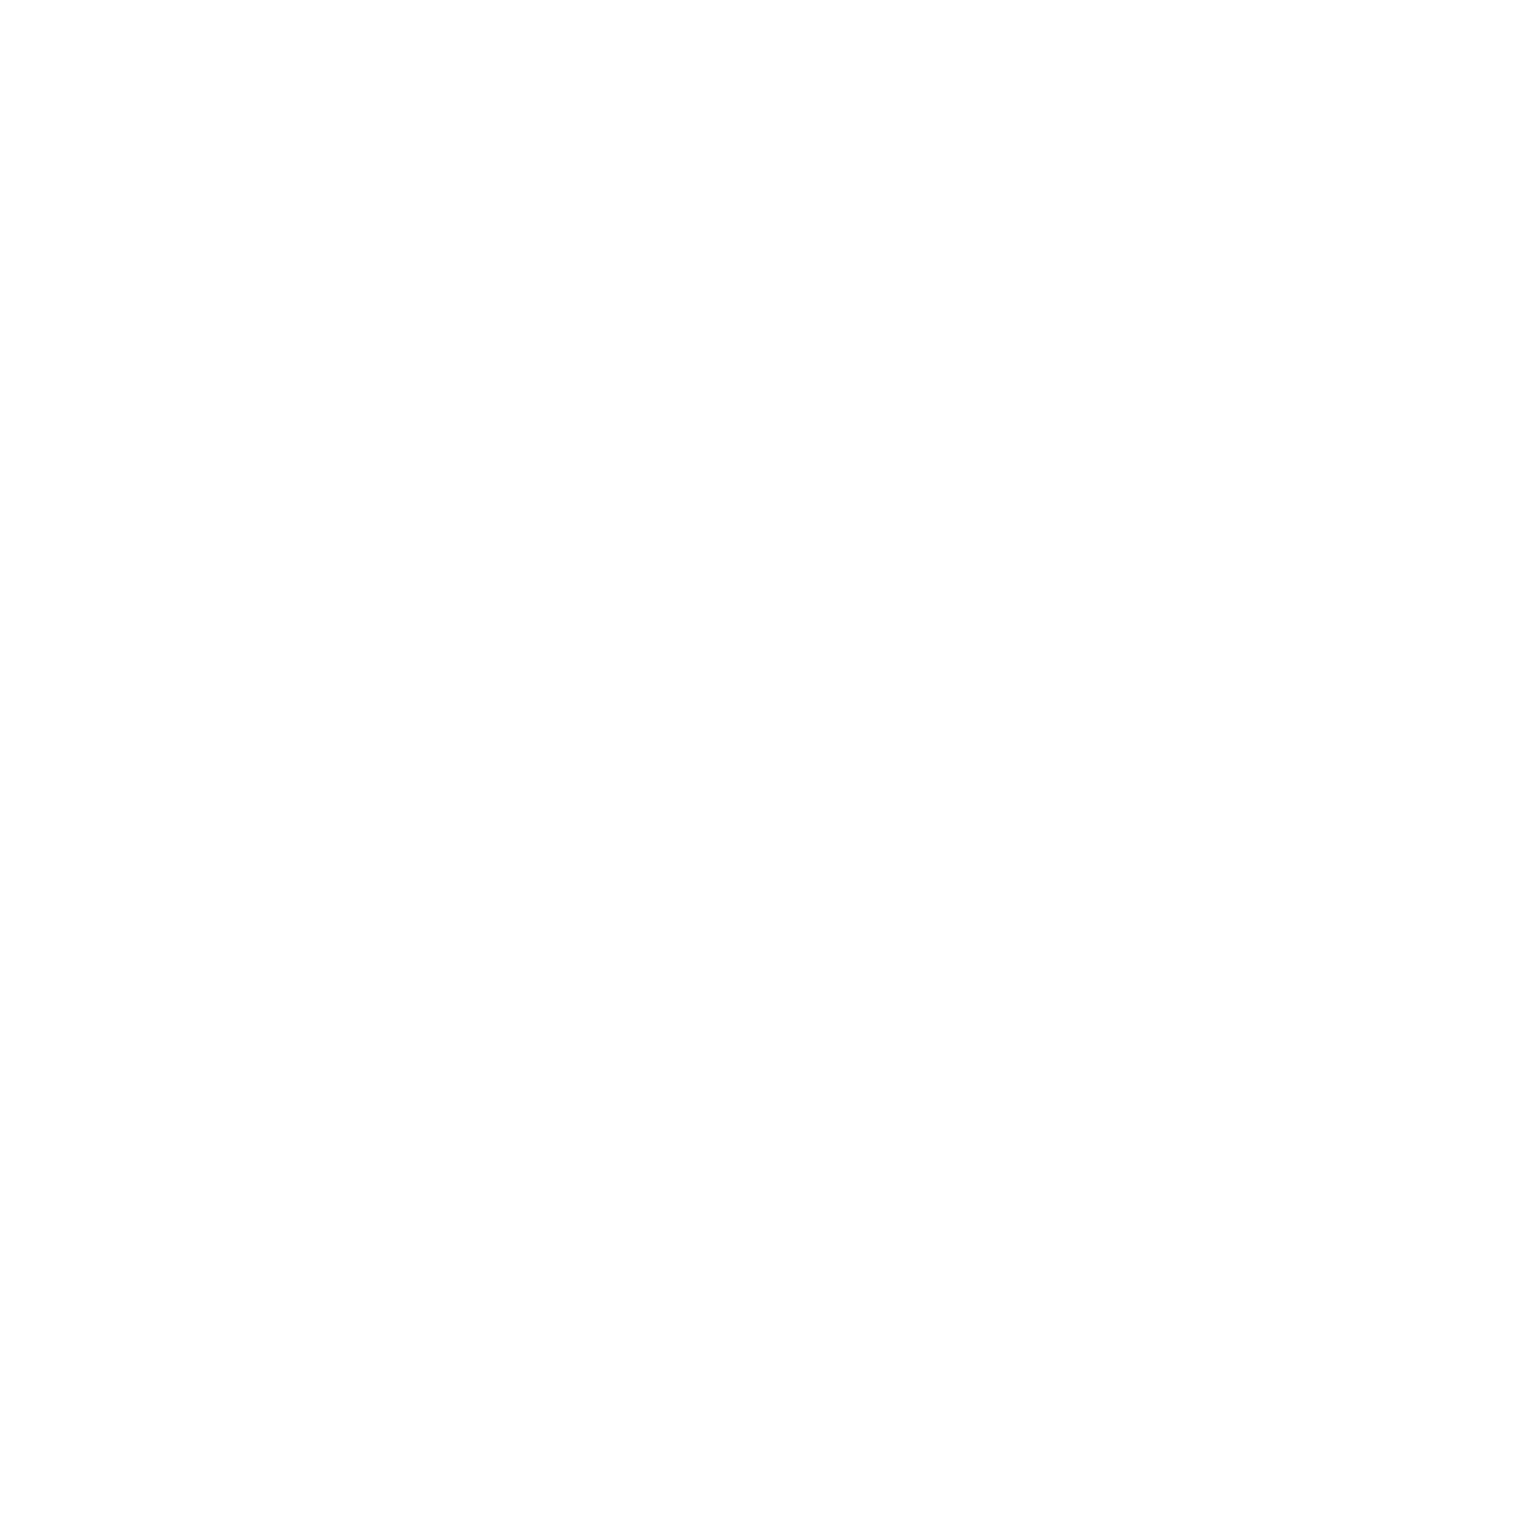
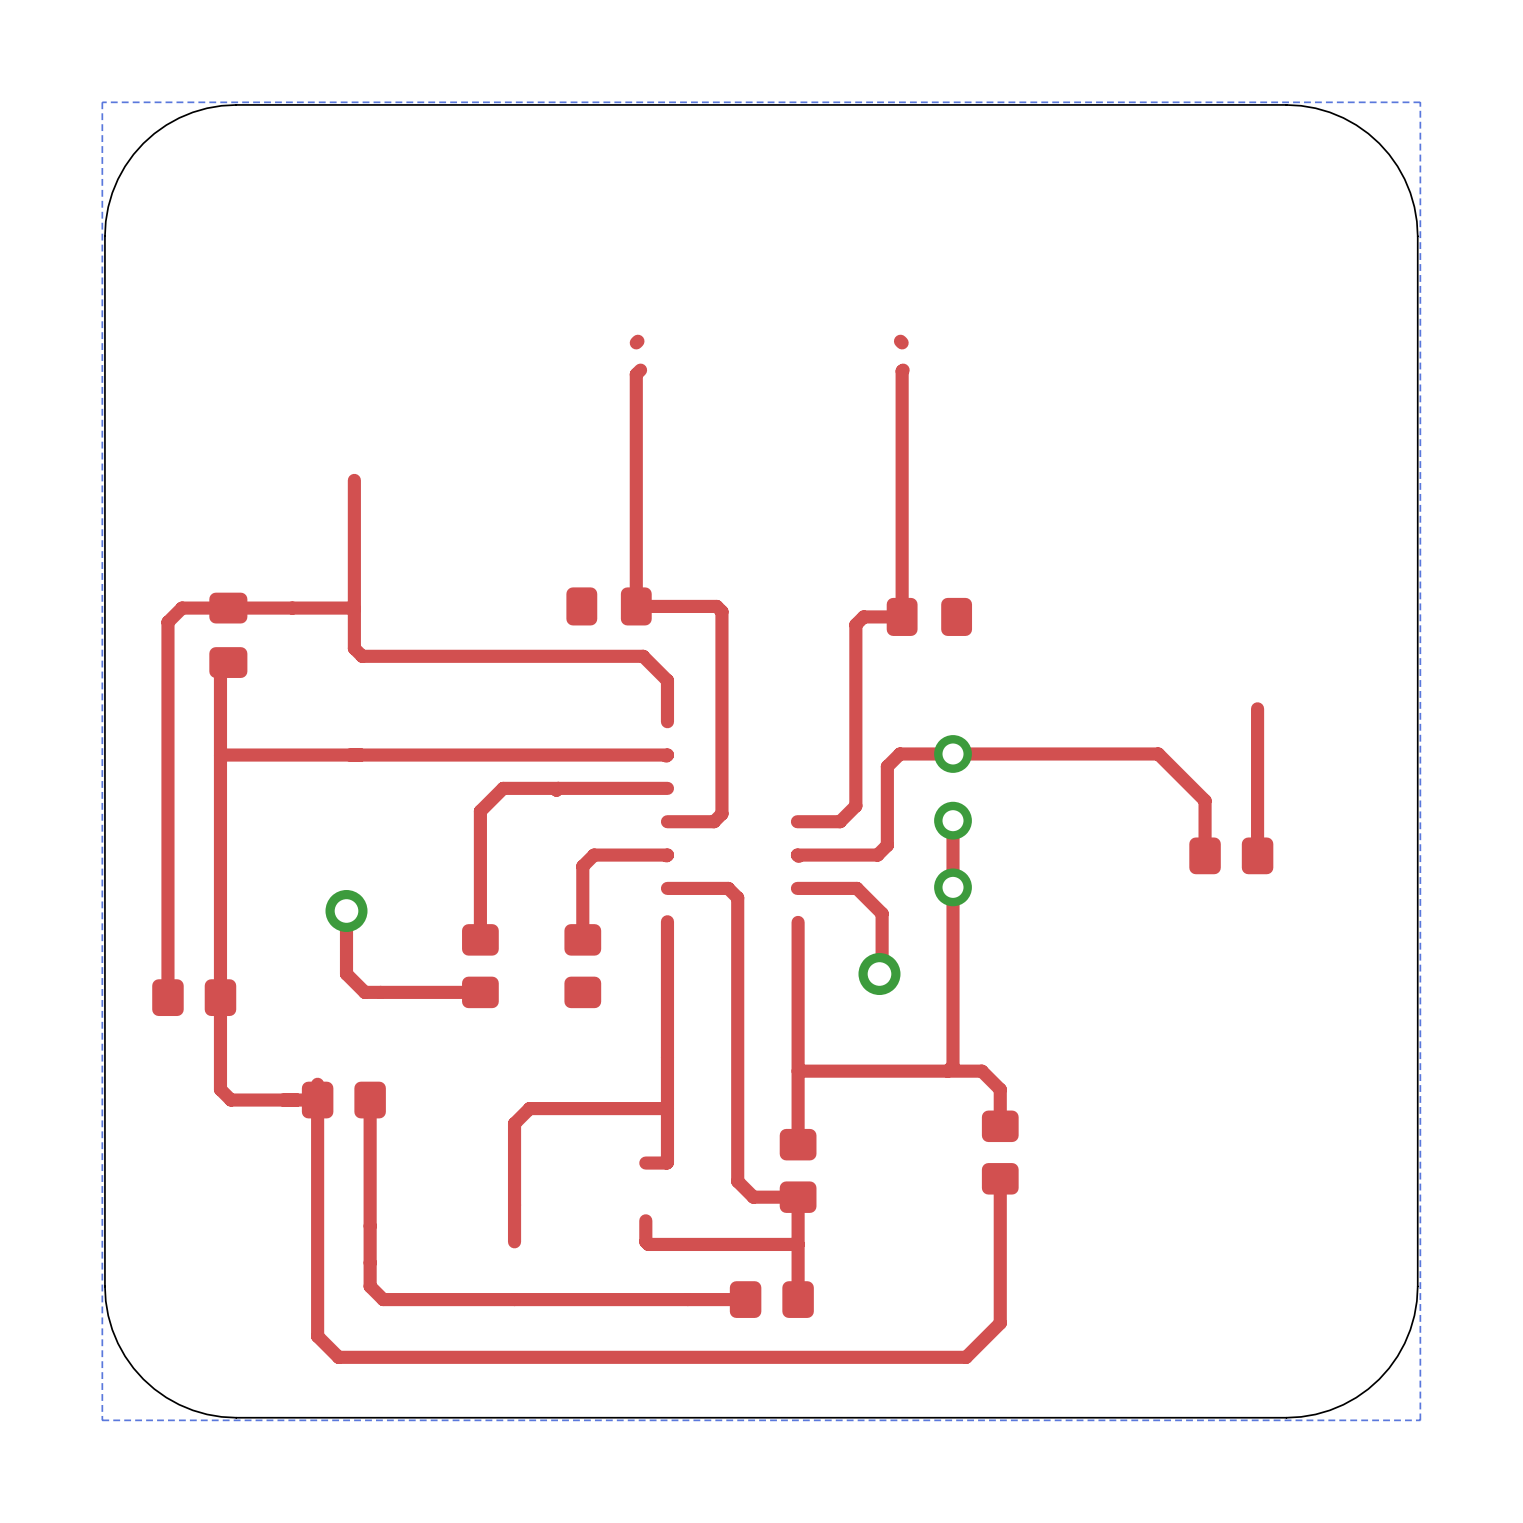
bottom zone outline: none -> (1420, 102) (1420, 1420) (102, 1420) (102, 102) (1420, 102)
board edge: none -> (1286, 104) (236, 104) (207, 108) (179, 117) (154, 133) (133, 154) (125, 166) (112, 192) (105, 221) (104, 236) (104, 1286) (108, 1315) (117, 1343) (133, 1368) (154, 1389) (166, 1397) (192, 1410) (221, 1416) (236, 1417) (1286, 1417) (1315, 1414) (1343, 1404) (1368, 1389) (1389, 1368) (1404, 1343) (1410, 1329) (1414, 1315) (1417, 1286) (1416, 221) (1414, 207) (1404, 179) (1389, 154) (1379, 143) (1356, 125) (1329, 112) (1301, 105) (1286, 104)
top track: none -> (637, 341) (636, 342)
top track: none -> (900, 341) (902, 342)
top track: none -> (640, 370) (636, 374) (636, 606) (716, 606) (721, 611) (721, 813) (714, 821) (667, 821)
top track: none -> (903, 370) (902, 616) (863, 616) (855, 624) (855, 805) (840, 821) (797, 821)
top track: none -> (354, 480) (354, 648) (362, 656) (643, 656) (667, 680) (667, 721)
part: none -> (609, 606)
top track: none -> (354, 609) (182, 608) (167, 622) (167, 997)
part: none -> (929, 616)
part: none -> (228, 635)
top track: none -> (228, 662) (220, 670) (220, 1089) (230, 1100) (317, 1100)
top track: none -> (1257, 708) (1257, 855)
top track: none -> (666, 756) (220, 756)
top track: none -> (667, 788) (503, 788) (480, 811) (480, 939)
top track: none -> (953, 820) (953, 1065) (947, 1071)
part: none -> (953, 820)
top track: none -> (666, 855) (594, 855) (582, 866) (582, 939)
top track: none -> (1205, 855) (1205, 800) (1158, 753) (899, 753) (887, 766) (887, 845) (877, 855) (797, 855) (798, 856)
part: none -> (1231, 855)
top track: none -> (667, 888) (728, 888) (737, 897) (737, 1181) (753, 1197) (798, 1197) (798, 1299)
top track: none -> (797, 888) (856, 888) (882, 913) (882, 971) (879, 974)
top track: none -> (346, 910) (346, 974) (364, 992) (480, 992)
via: none -> (346, 910)
top track: none -> (667, 921) (667, 1162) (645, 1163)
top track: none -> (798, 922) (798, 1144)
part: none -> (480, 966)
part: none -> (582, 966)
via: none -> (879, 974)
part: none -> (194, 997)
top track: none -> (798, 1071) (981, 1071) (1000, 1089) (1000, 1126)
top track: none -> (317, 1084) (317, 1336) (338, 1357) (966, 1357) (1000, 1323) (1000, 1178)
part: none -> (343, 1100)
top track: none -> (370, 1100) (370, 1286) (383, 1299) (745, 1299)
top track: none -> (667, 1108) (529, 1108) (514, 1123) (514, 1241)
part: none -> (1000, 1152)
part: none -> (798, 1170)
top track: none -> (645, 1220) (645, 1241) (648, 1244) (798, 1244)
part: none -> (771, 1299)

